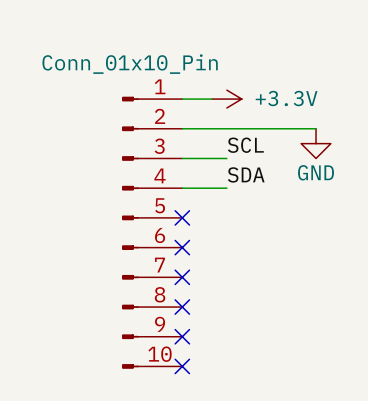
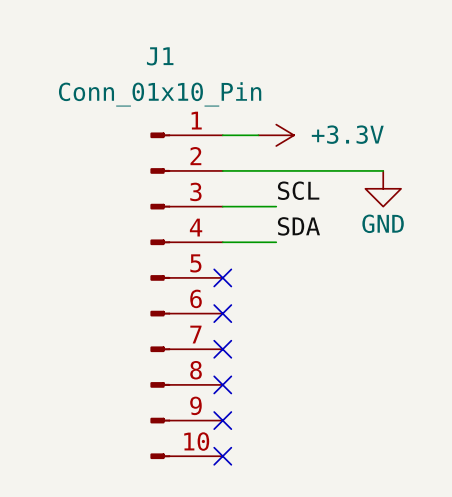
J1 name: none -> J1 (160, 56)

